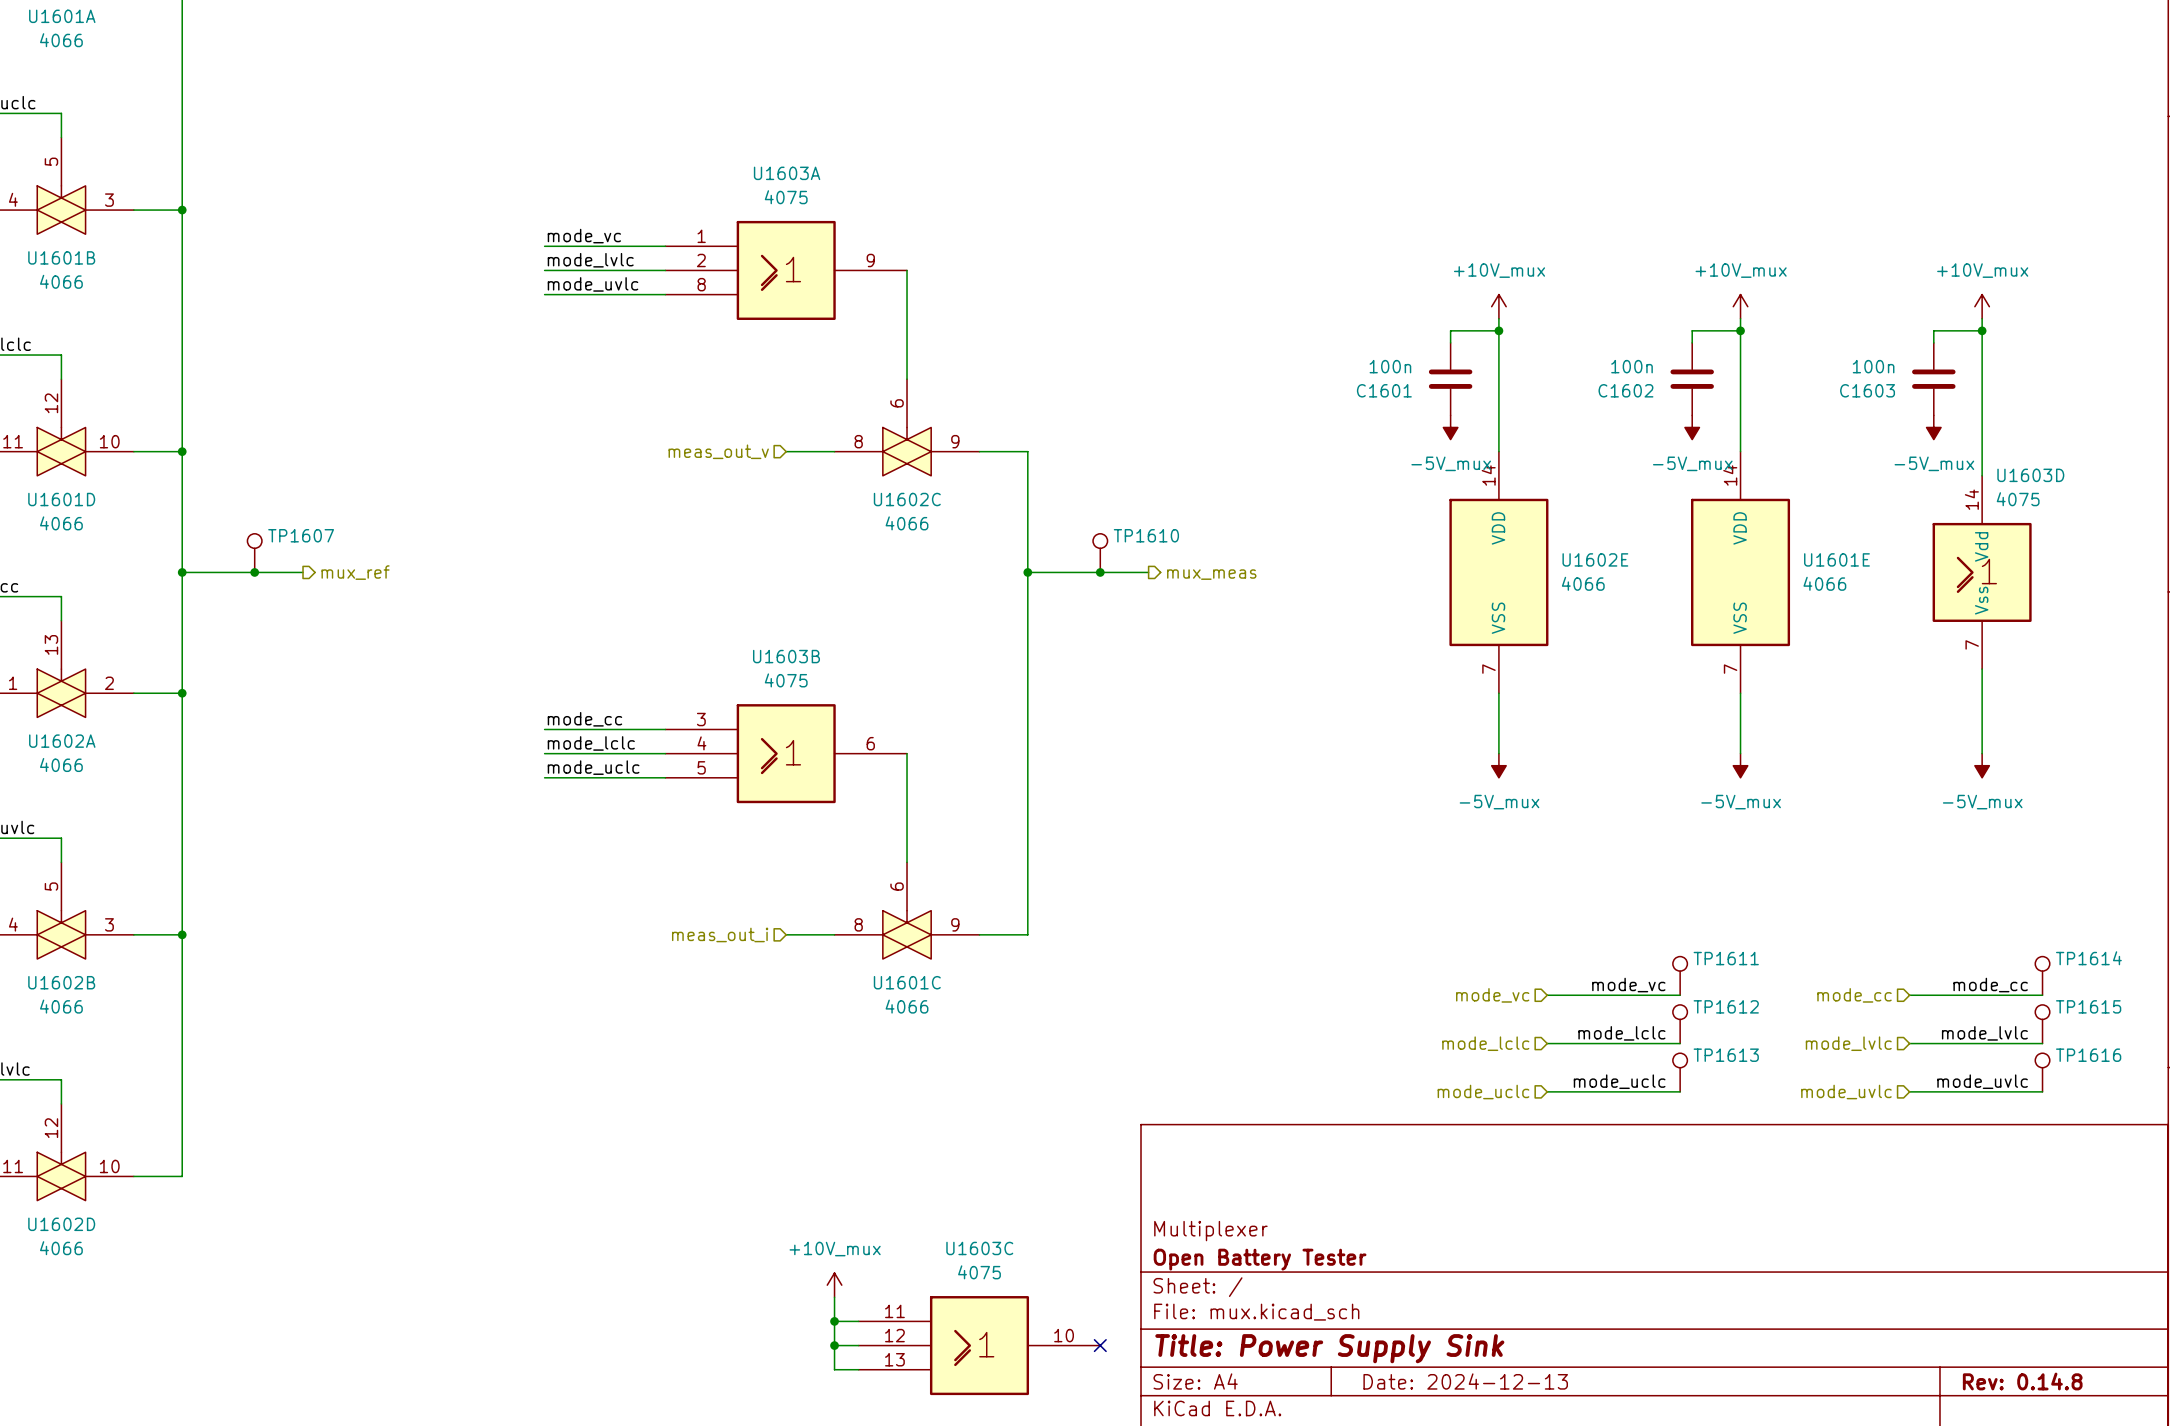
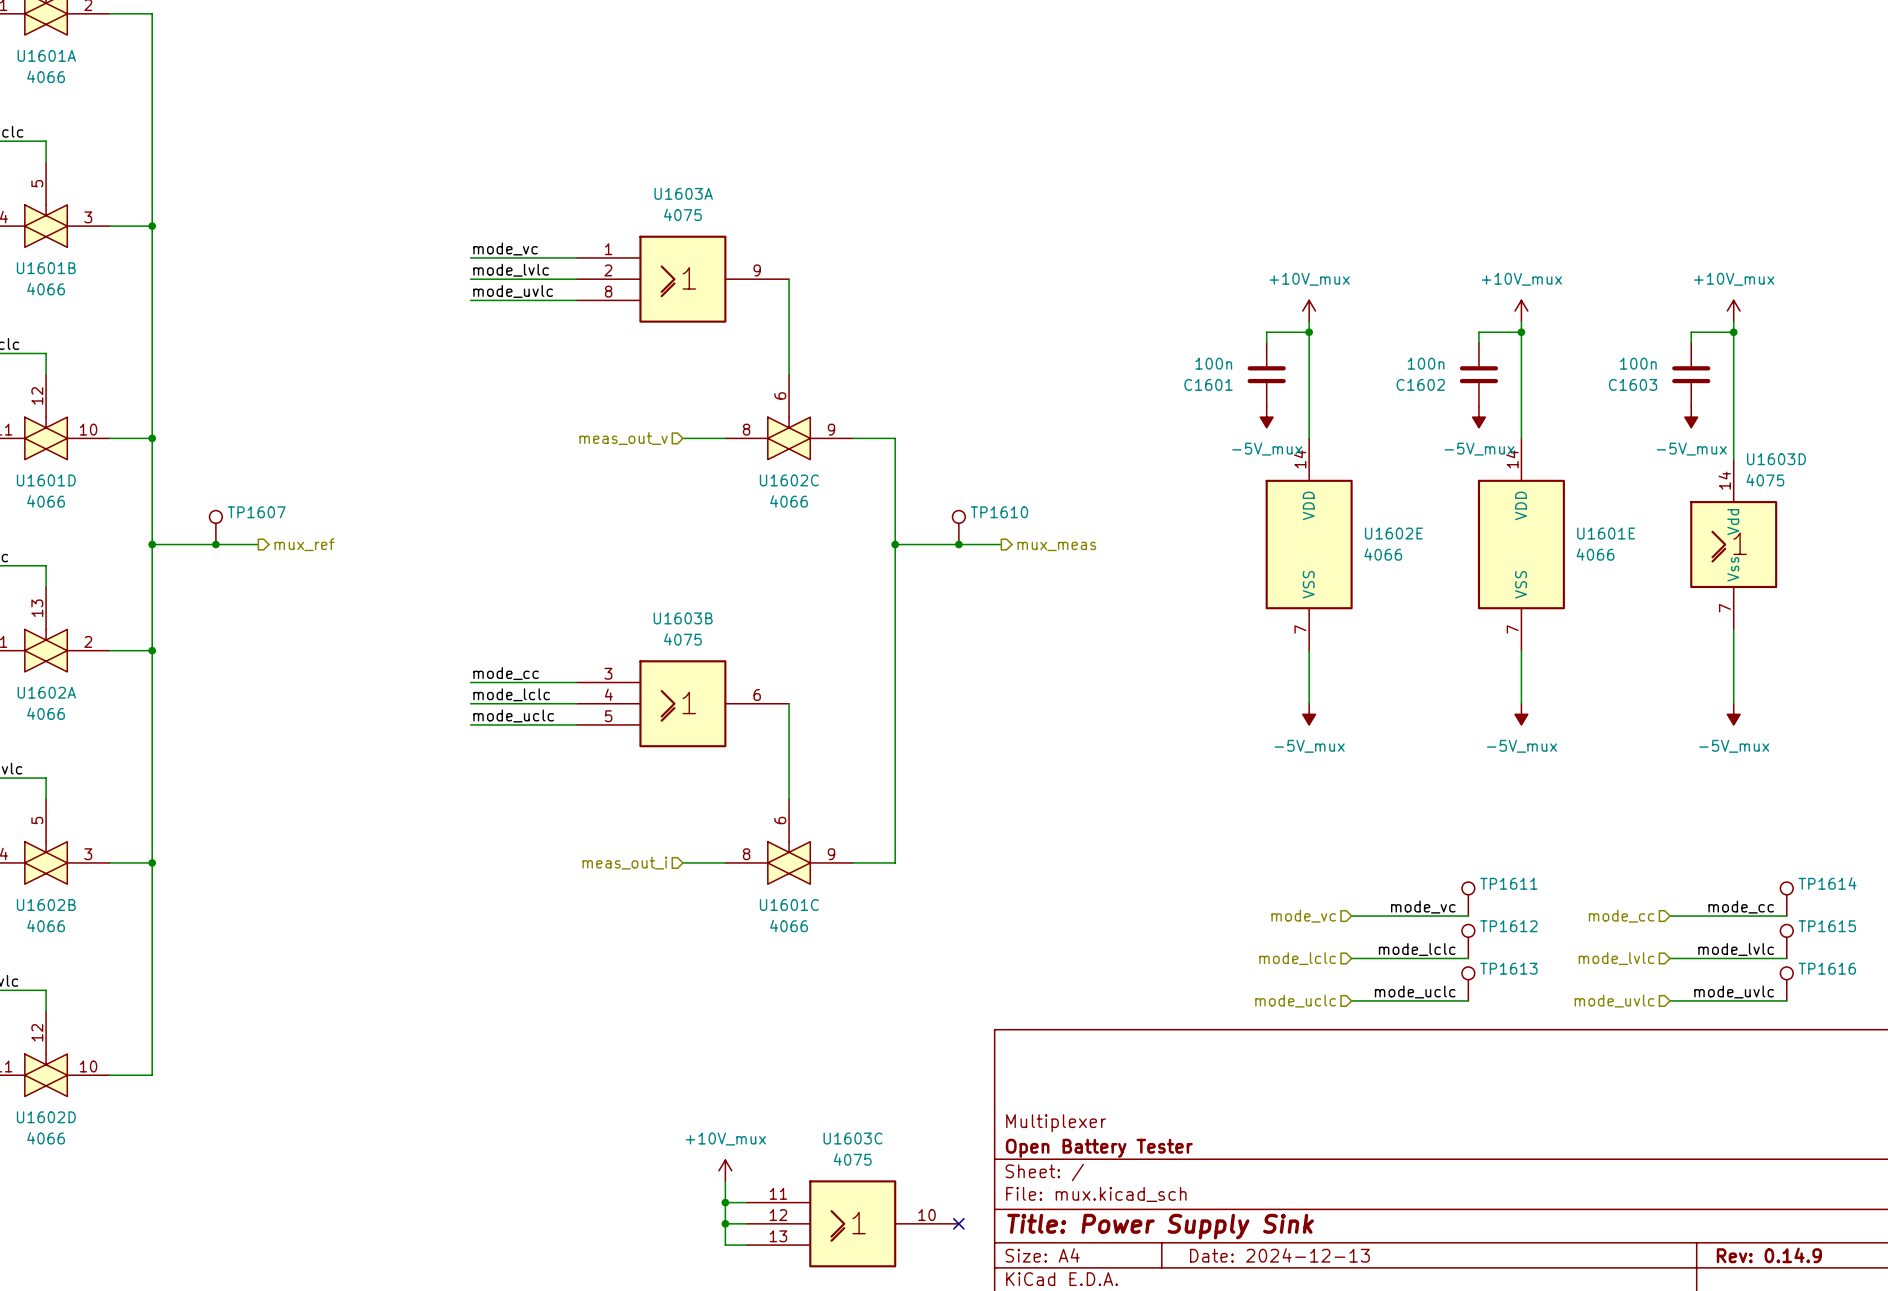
title block: Rev: 0.14.8 (2022, 1381) -> Rev: 0.14.9 (1769, 1255)

